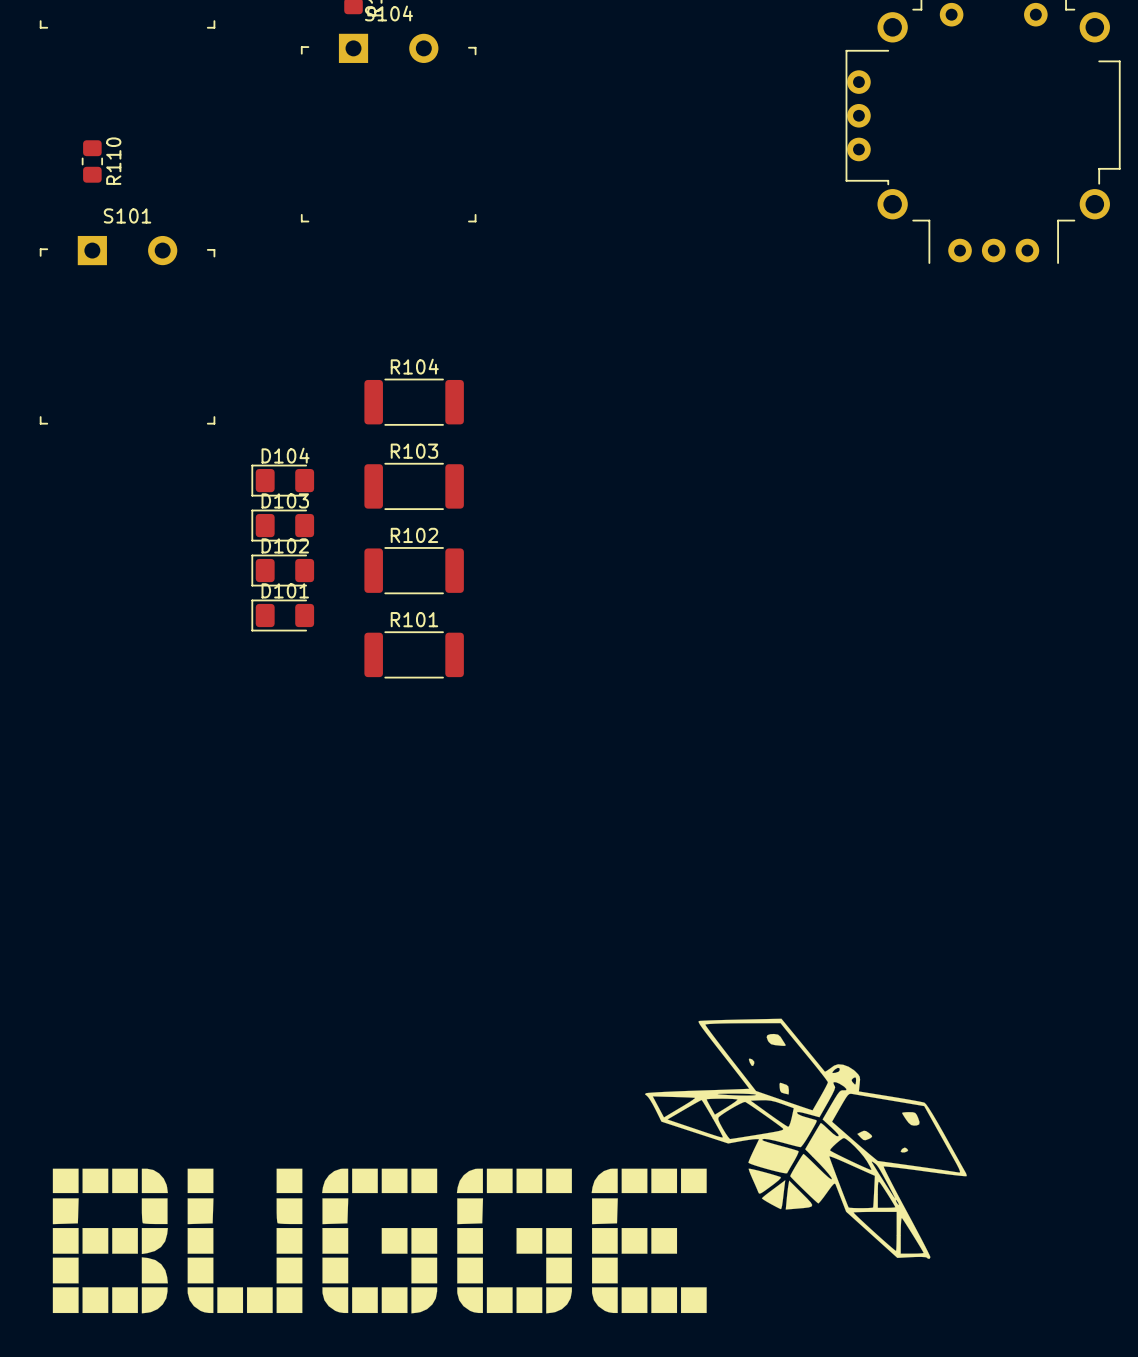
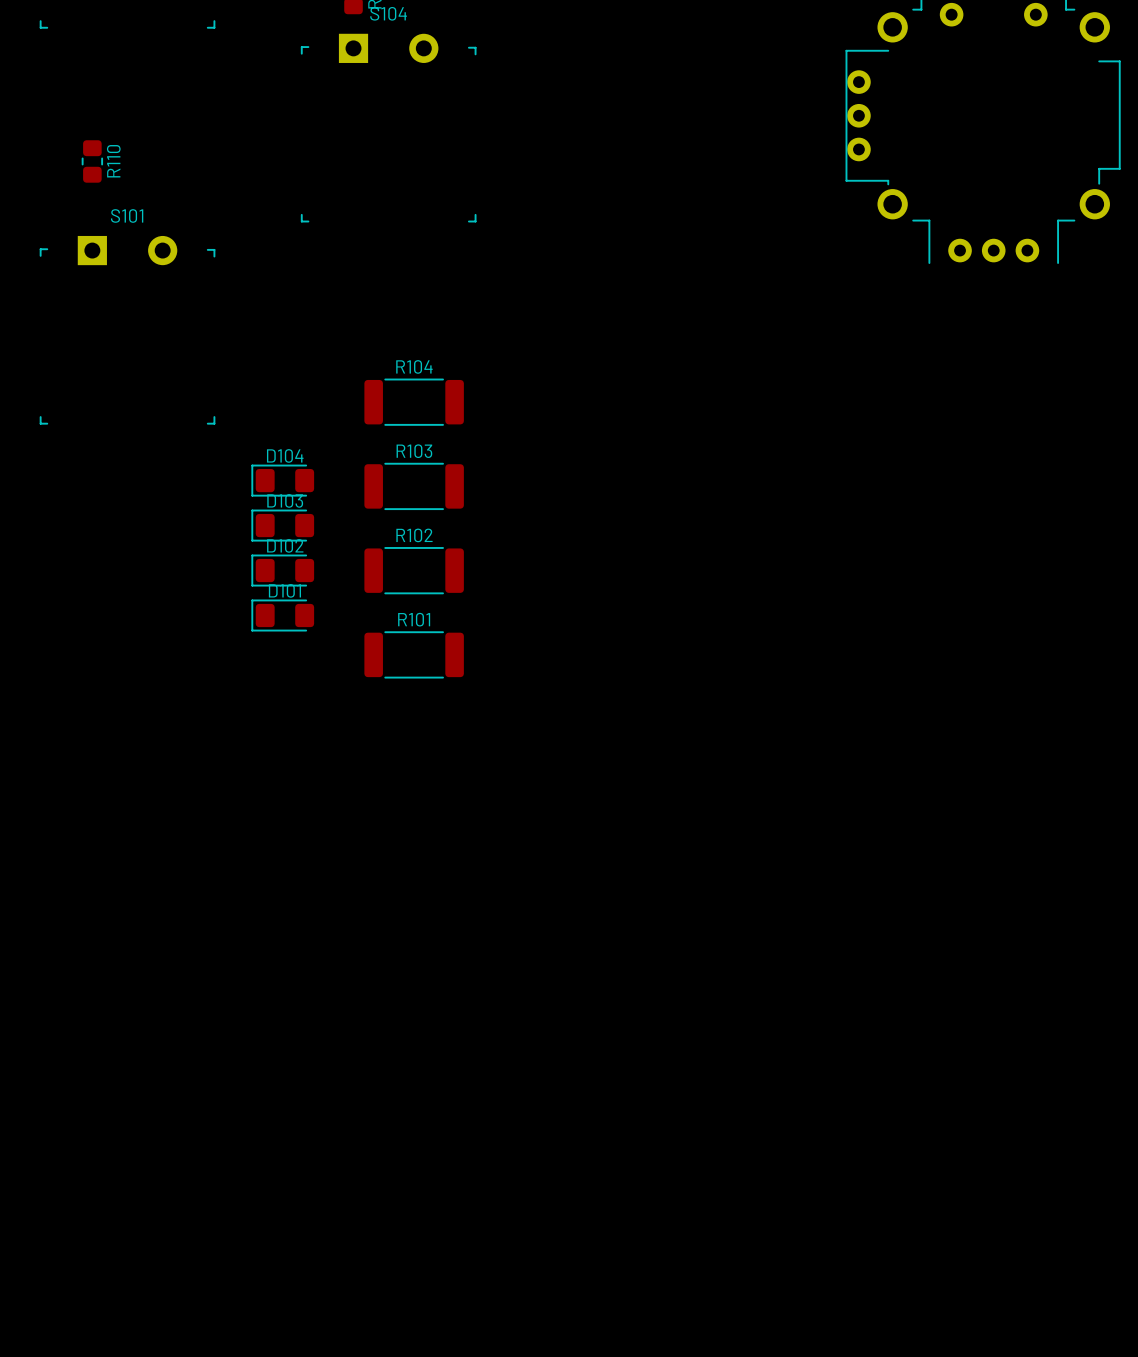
drawing: [52, 1018, 967, 1314] -> none

